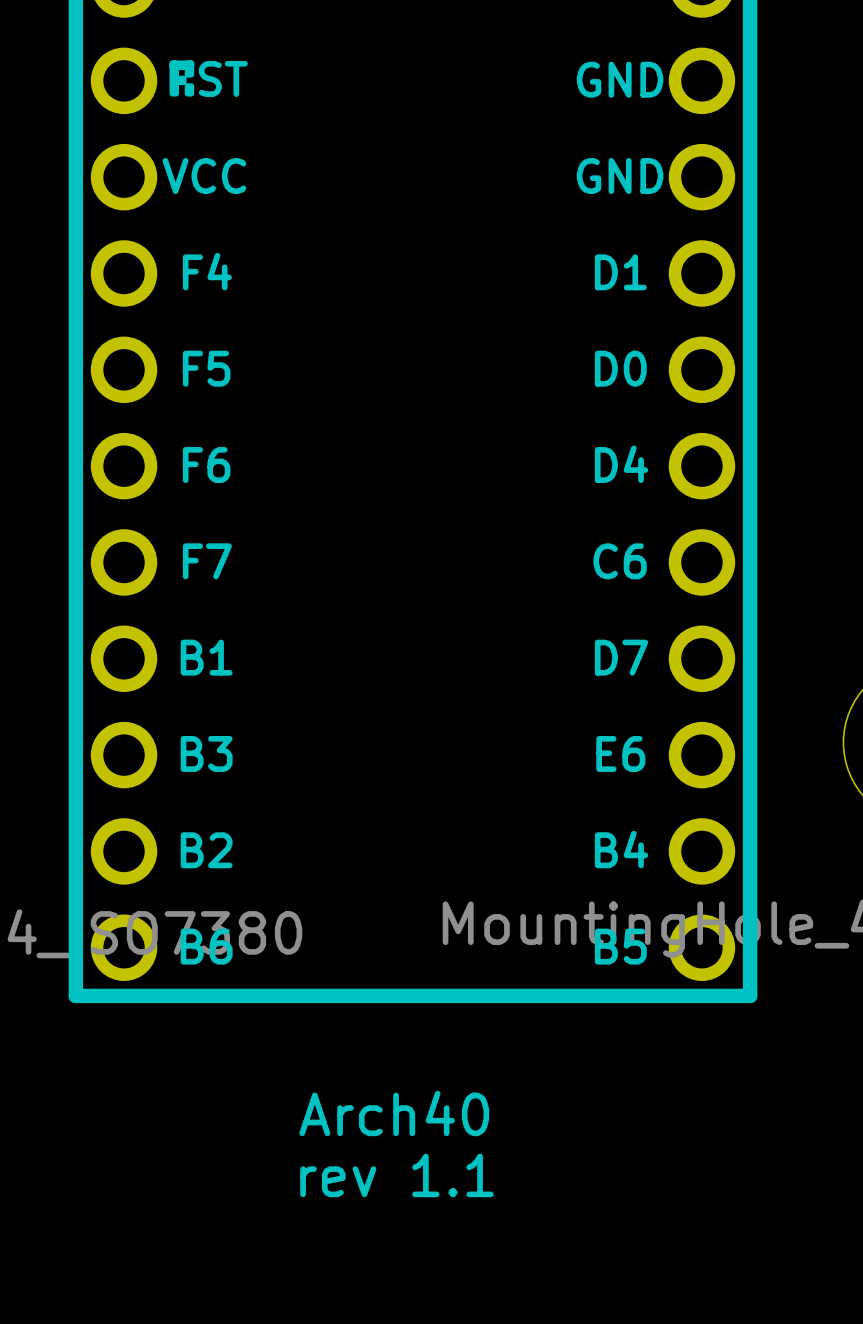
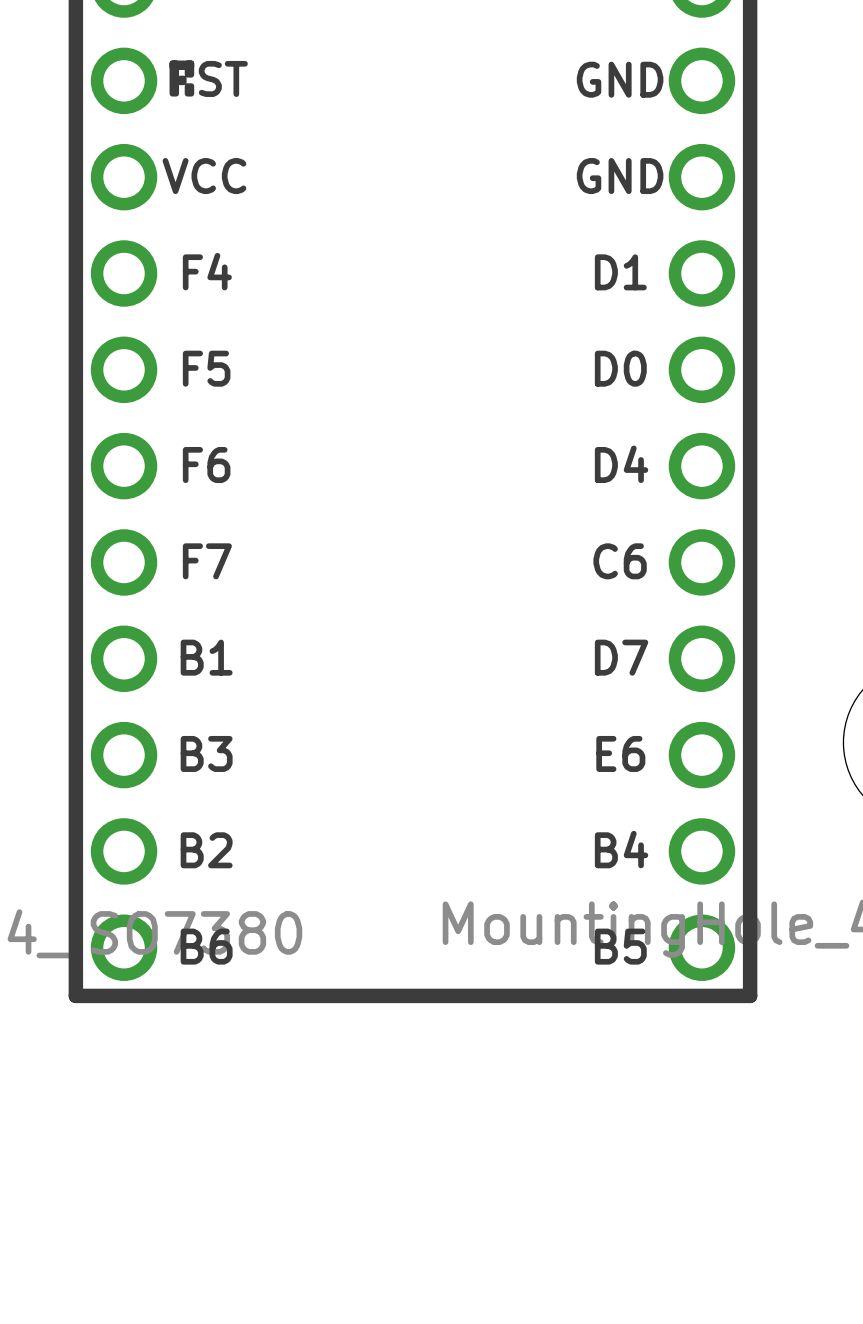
text: Arch40 (394, 1113) -> none
text: rev 1.1 (396, 1175) -> none

